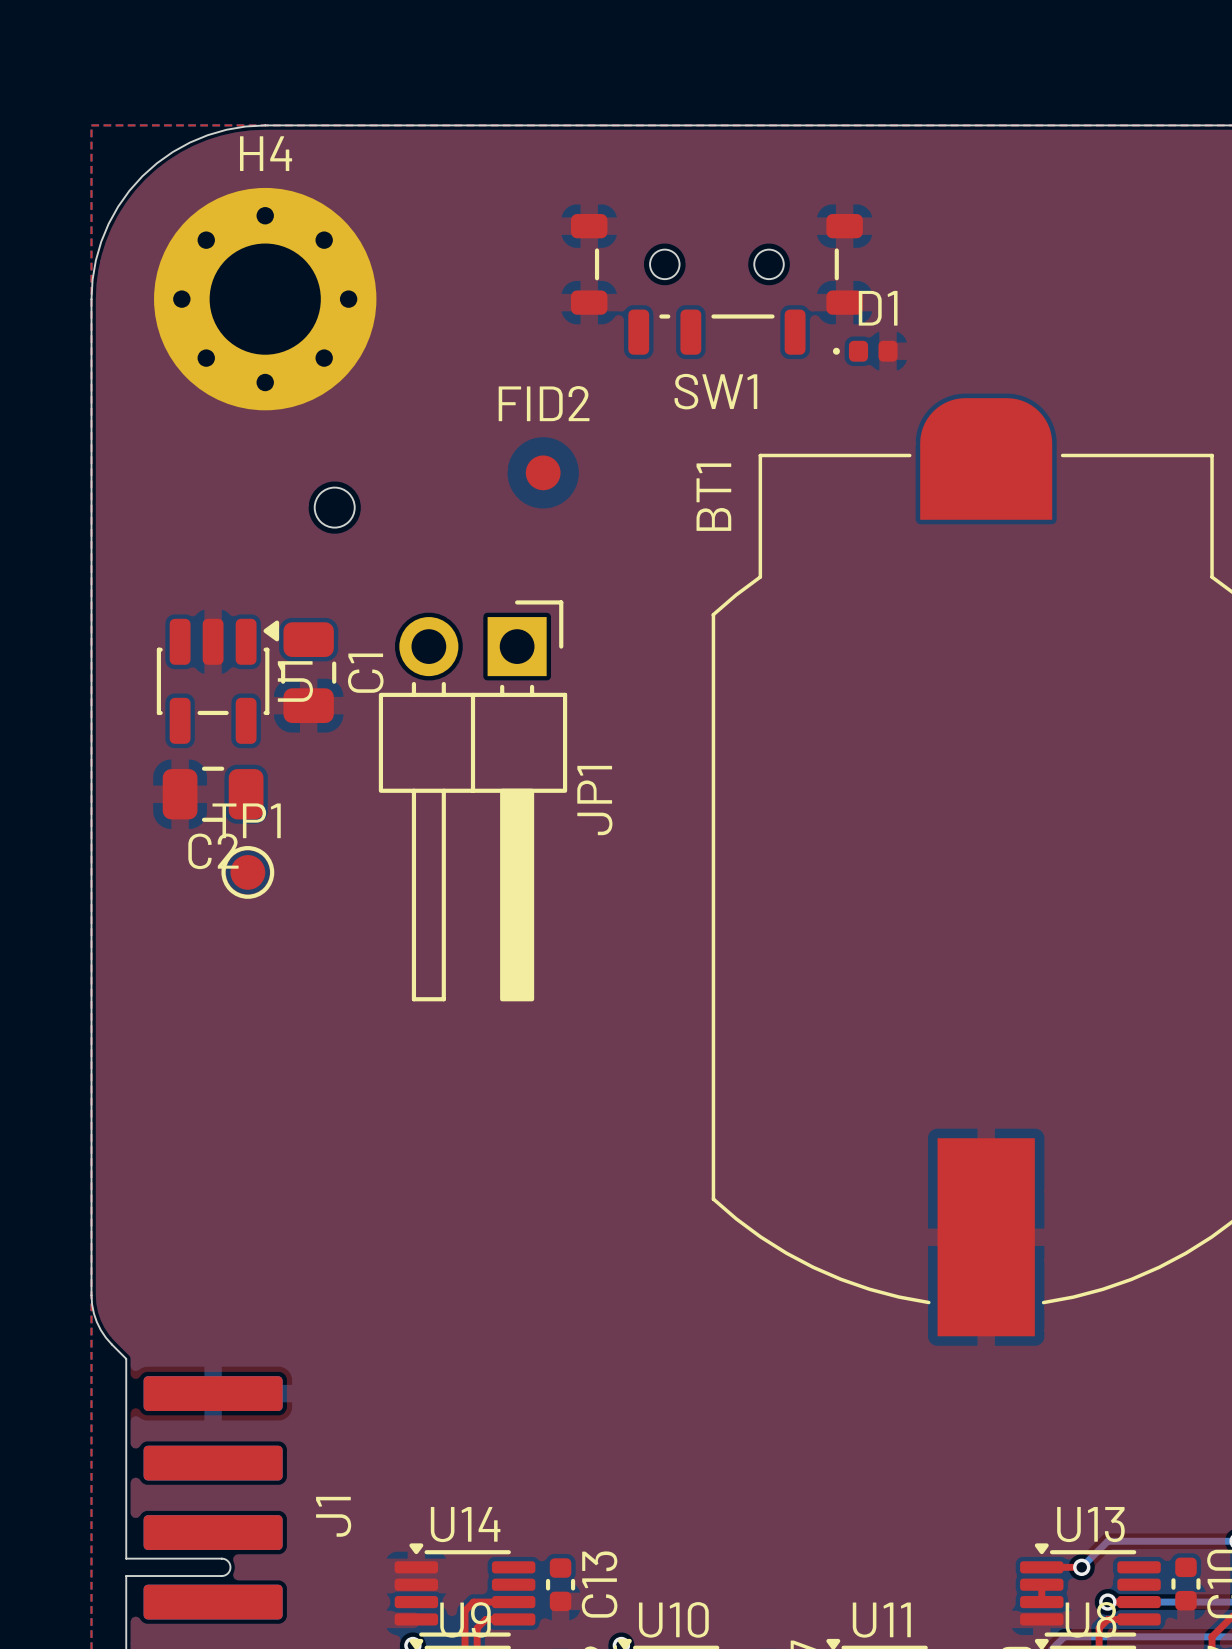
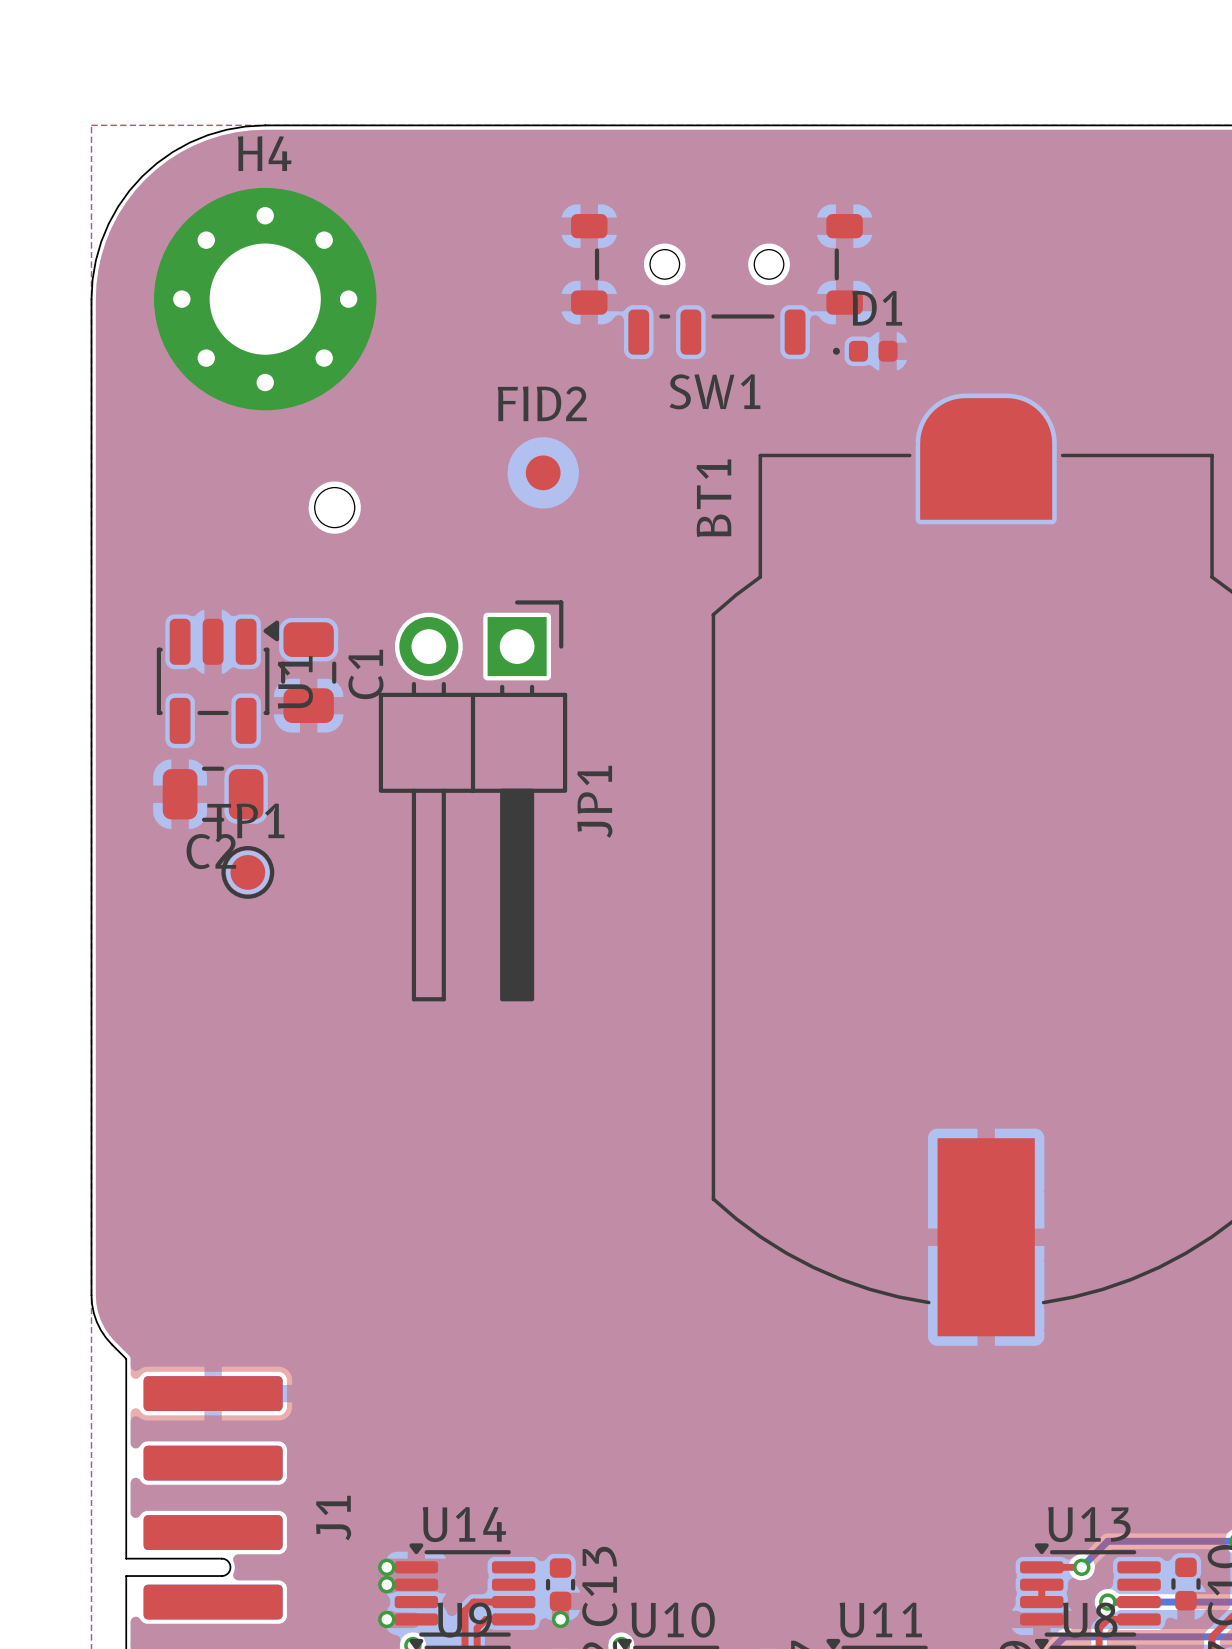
via: none -> (386, 1567)
via: none -> (386, 1584)
via: none -> (386, 1619)
via: none -> (560, 1619)

